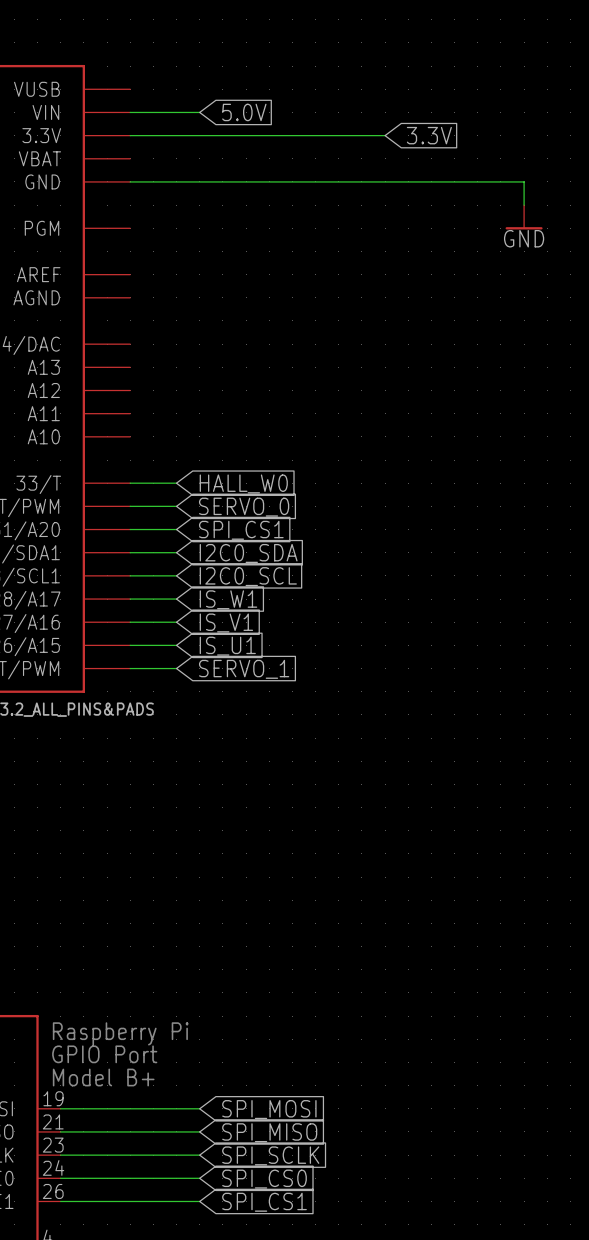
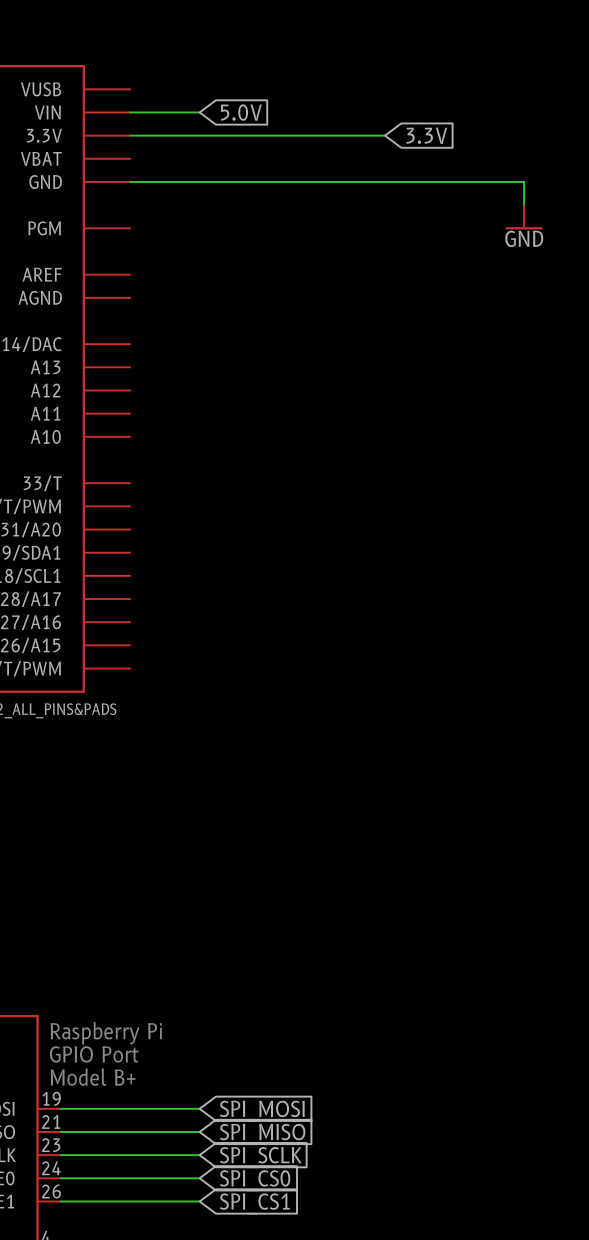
wire: (130, 483) (176, 483) -> none
global label: HALL_W0 (243, 483) -> none
wire: (130, 506) (176, 506) -> none
global label: SERVO_0 (244, 507) -> none
wire: (130, 529) (176, 529) -> none
global label: SPI_CS1 (241, 530) -> none
wire: (130, 552) (176, 552) -> none
global label: I2C0_SDA (248, 553) -> none
wire: (130, 575) (176, 575) -> none
global label: I2C0_SCL (248, 576) -> none
wire: (130, 599) (176, 599) -> none
global label: IS_W1 (228, 599) -> none
wire: (130, 622) (176, 622) -> none
global label: IS_V1 (226, 622) -> none
wire: (130, 645) (176, 645) -> none
global label: IS_U1 (227, 646) -> none
wire: (130, 668) (176, 668) -> none
global label: SERVO_1 (244, 669) -> none

